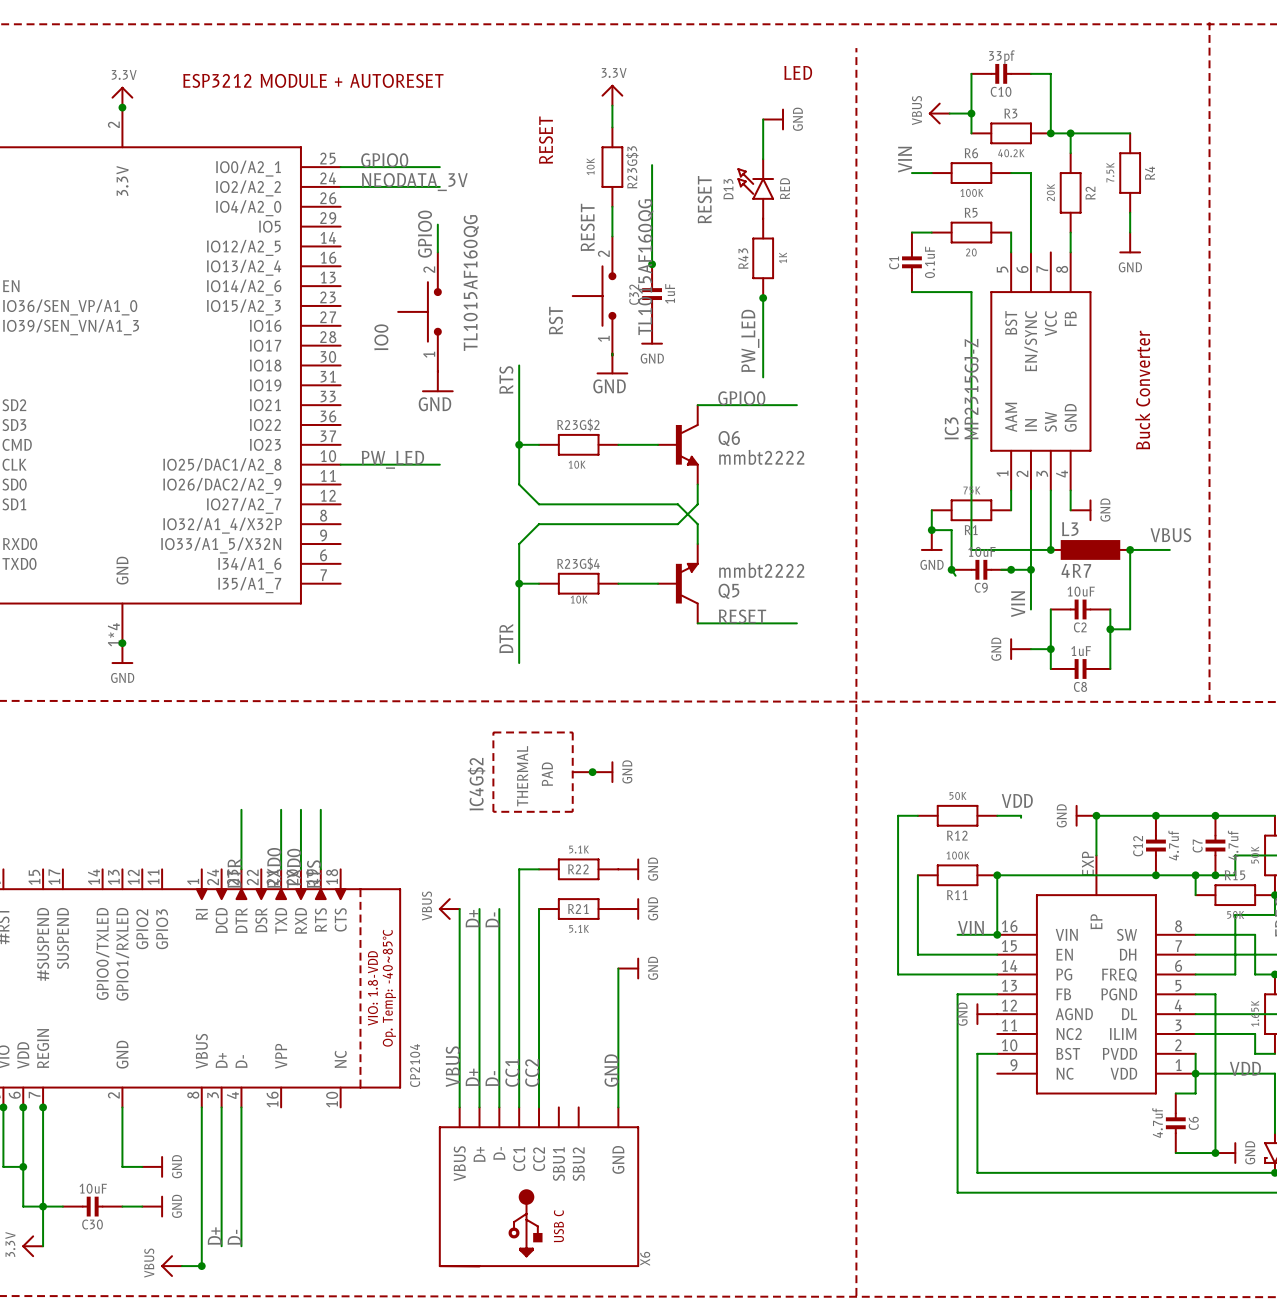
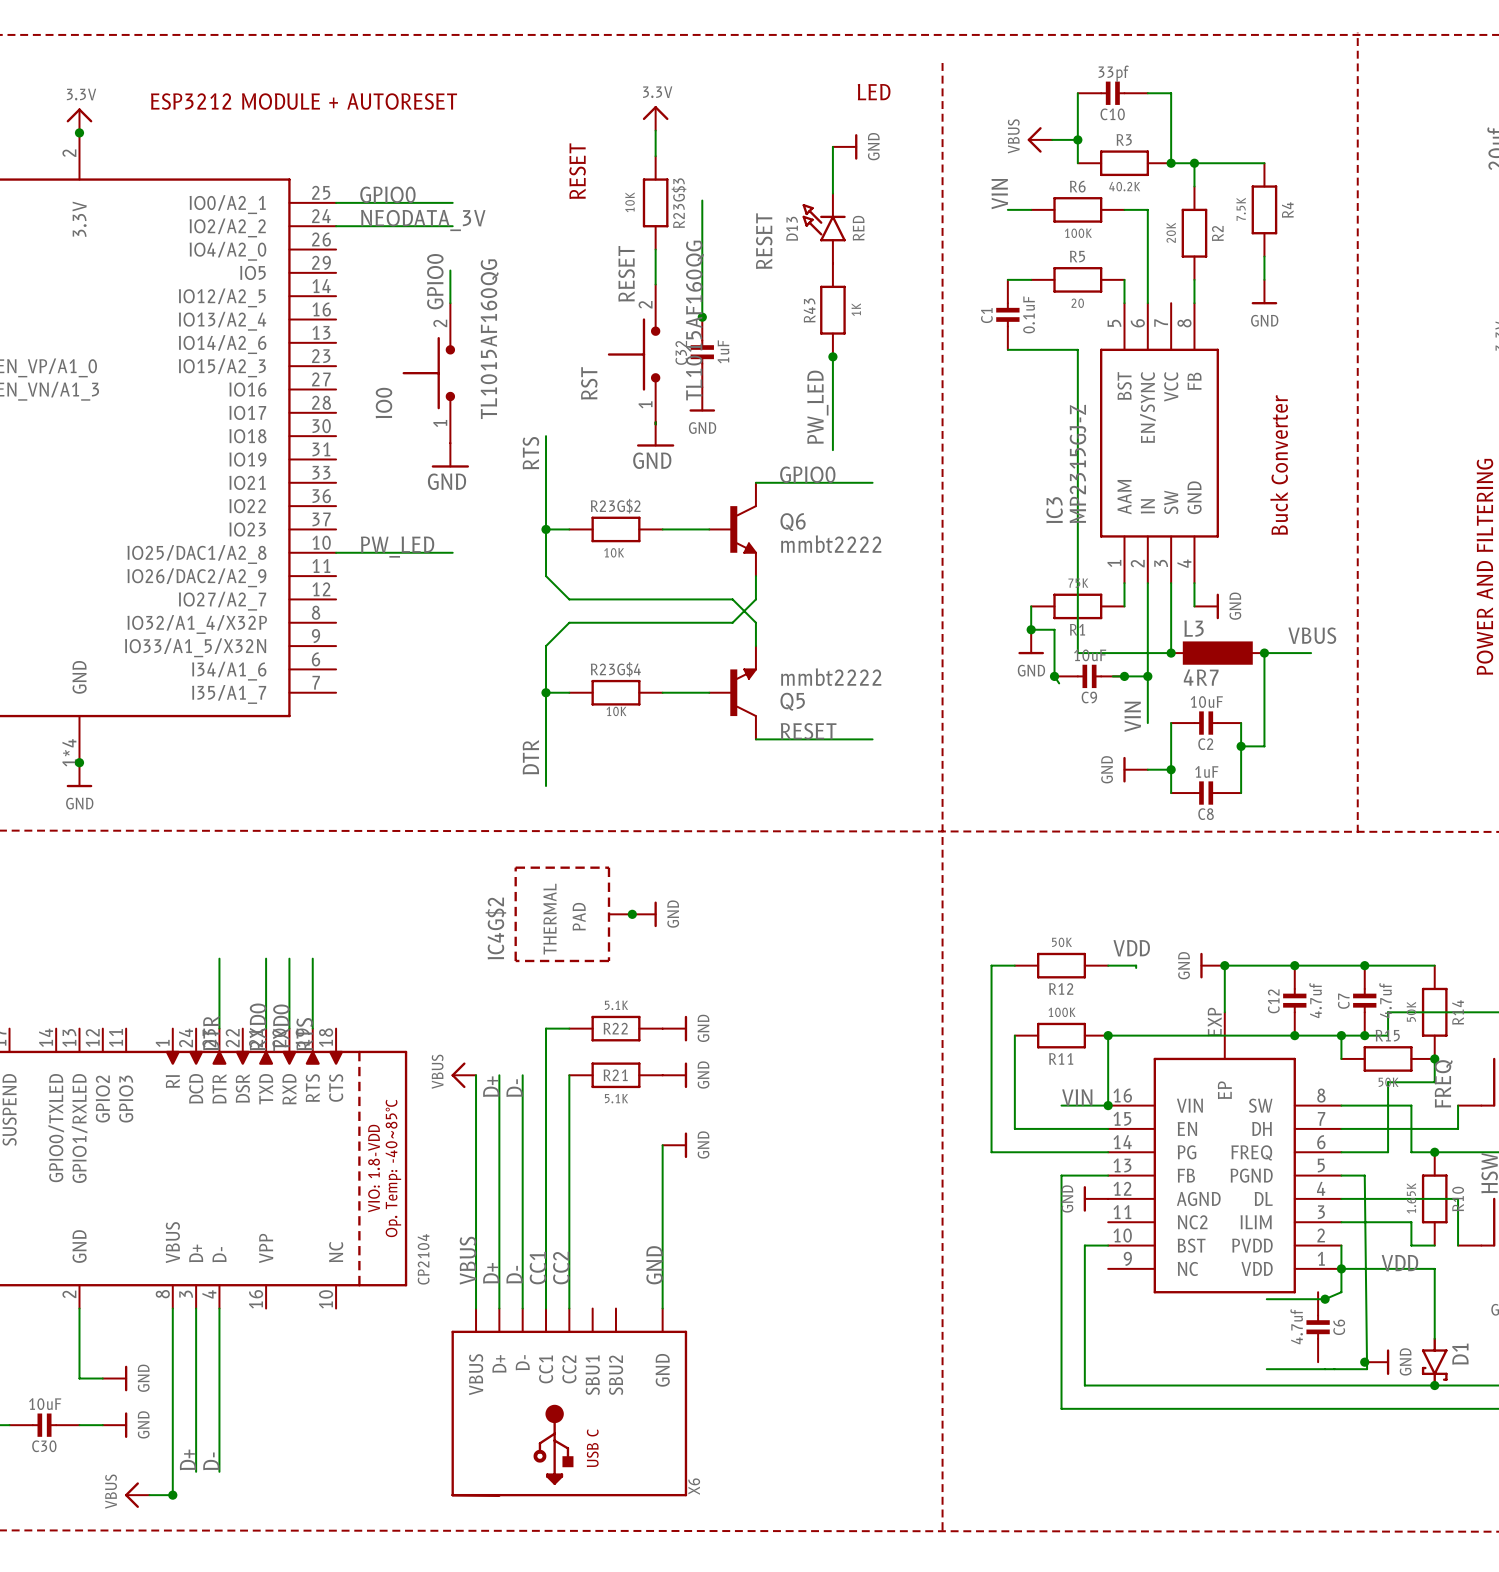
wire: (1215, 994) (1215, 1153) (1175, 1153) -> (1364, 1175) (1367, 1369) (1266, 1369)
wire: (1175, 1093) (1195, 1093) -> (1266, 1299) (1325, 1299) (1341, 1292)
junction: none -> (1325, 1299)

